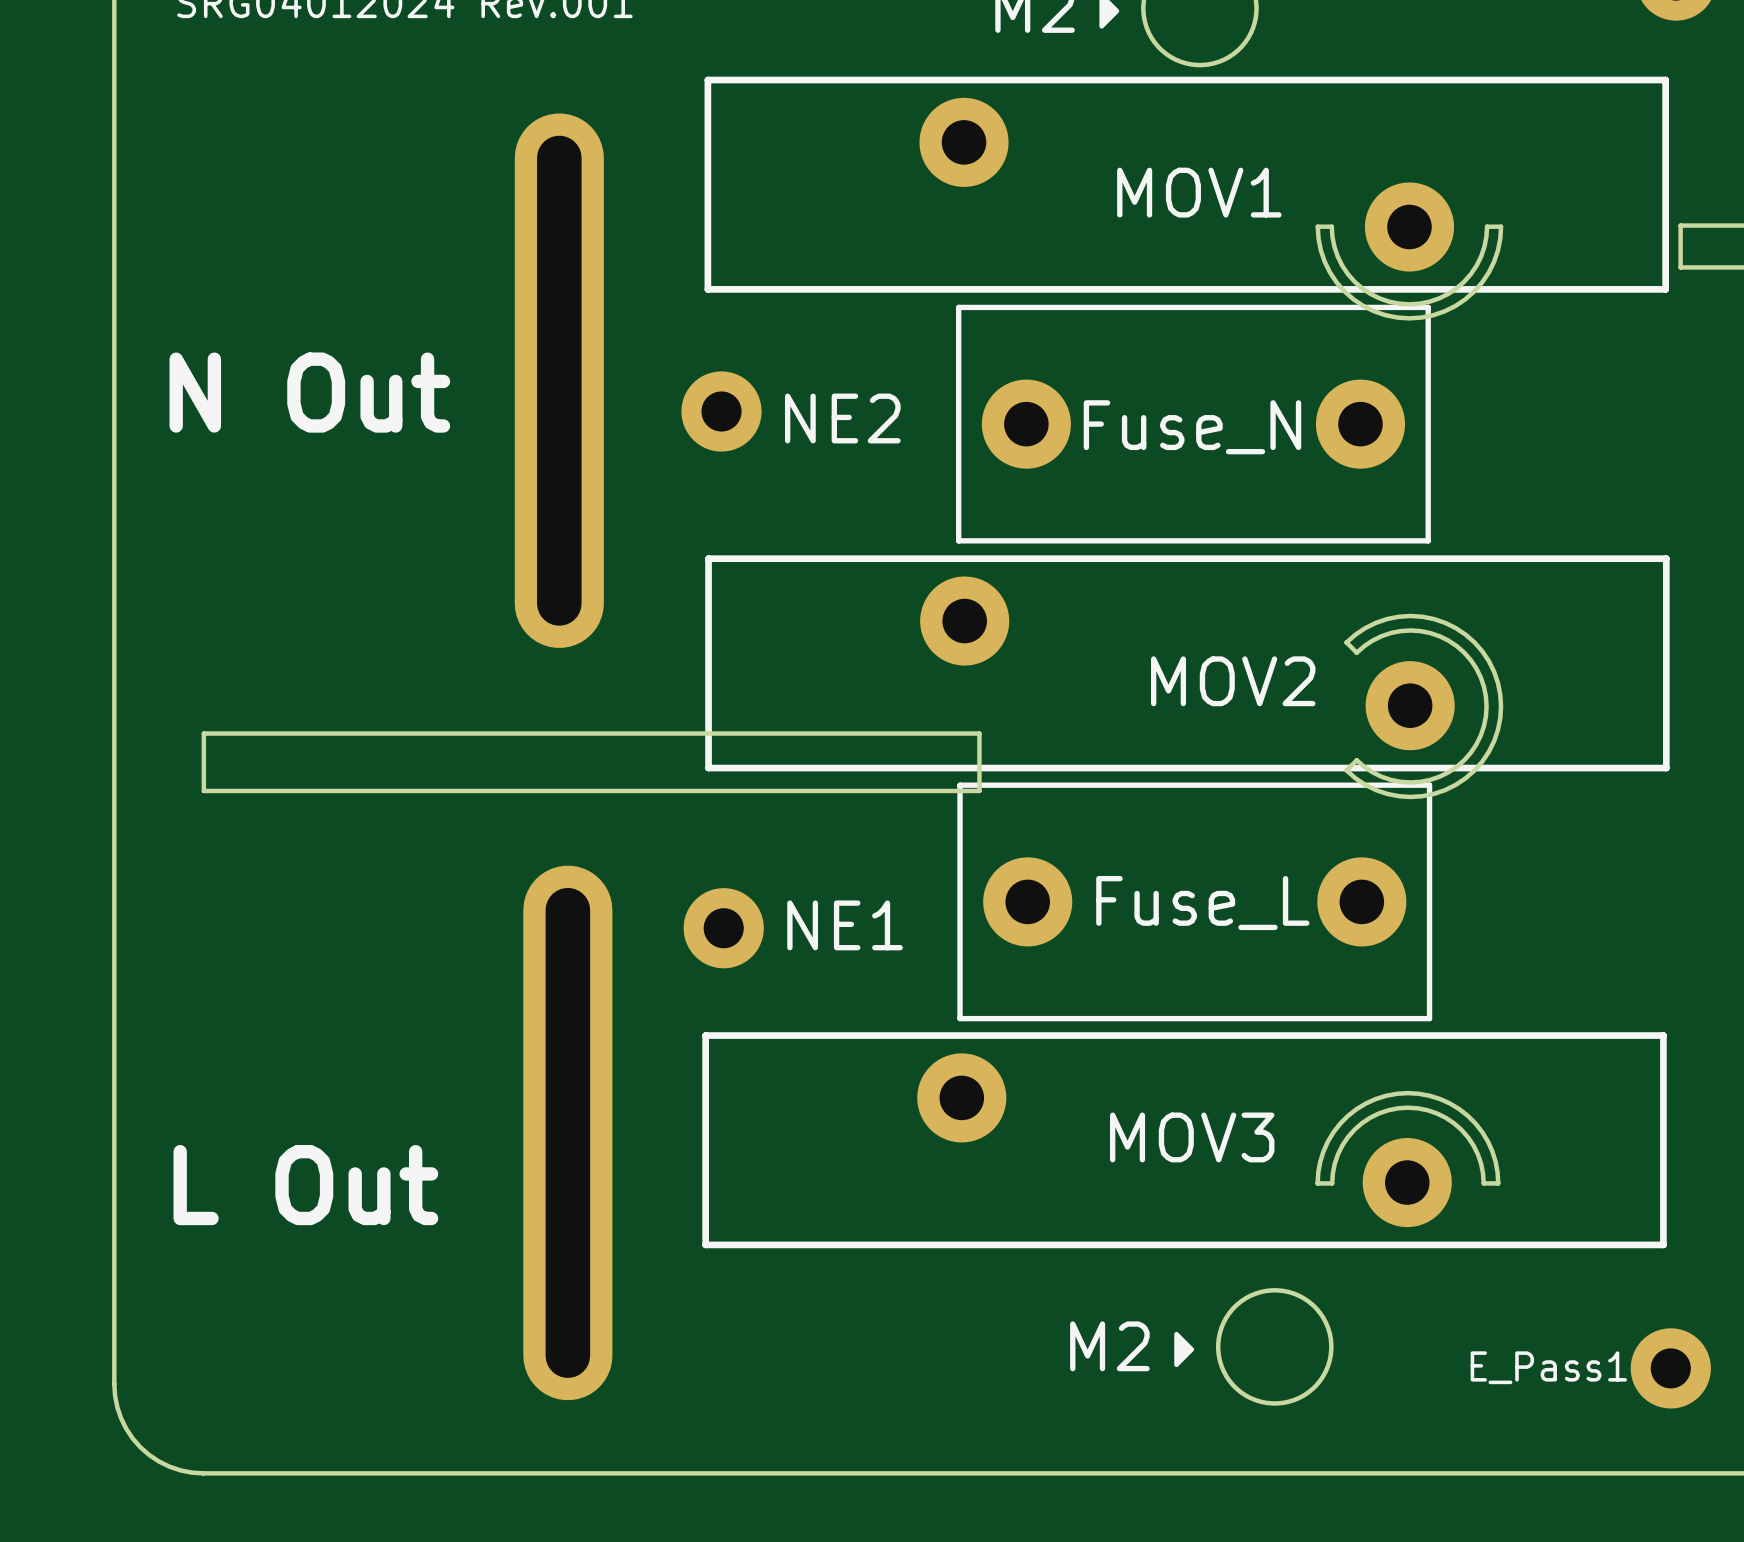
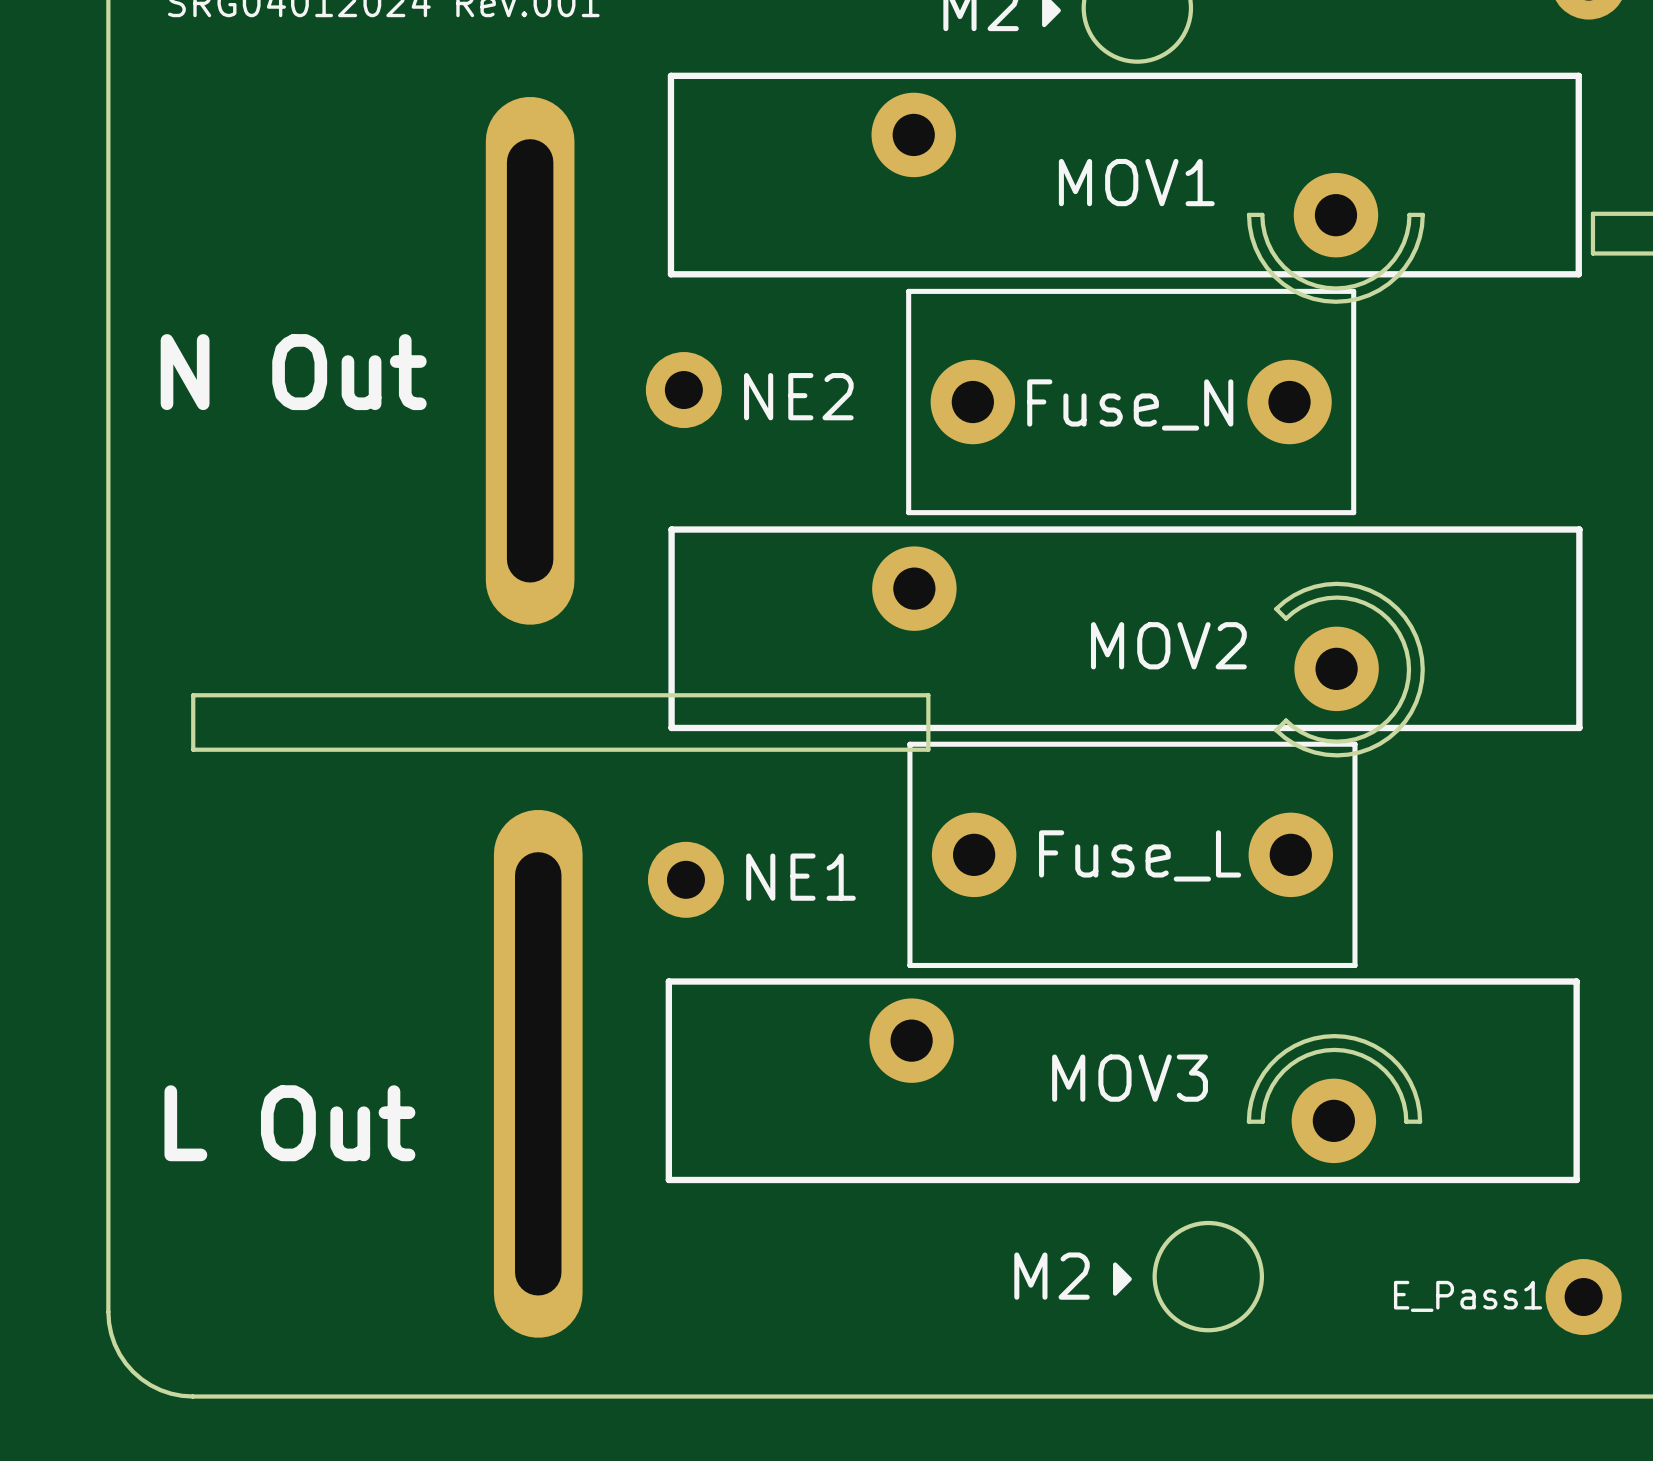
part footprint: [514, 113, 604, 648] -> [485, 96, 575, 625]
part footprint: [523, 865, 613, 1401] -> [493, 809, 583, 1338]

